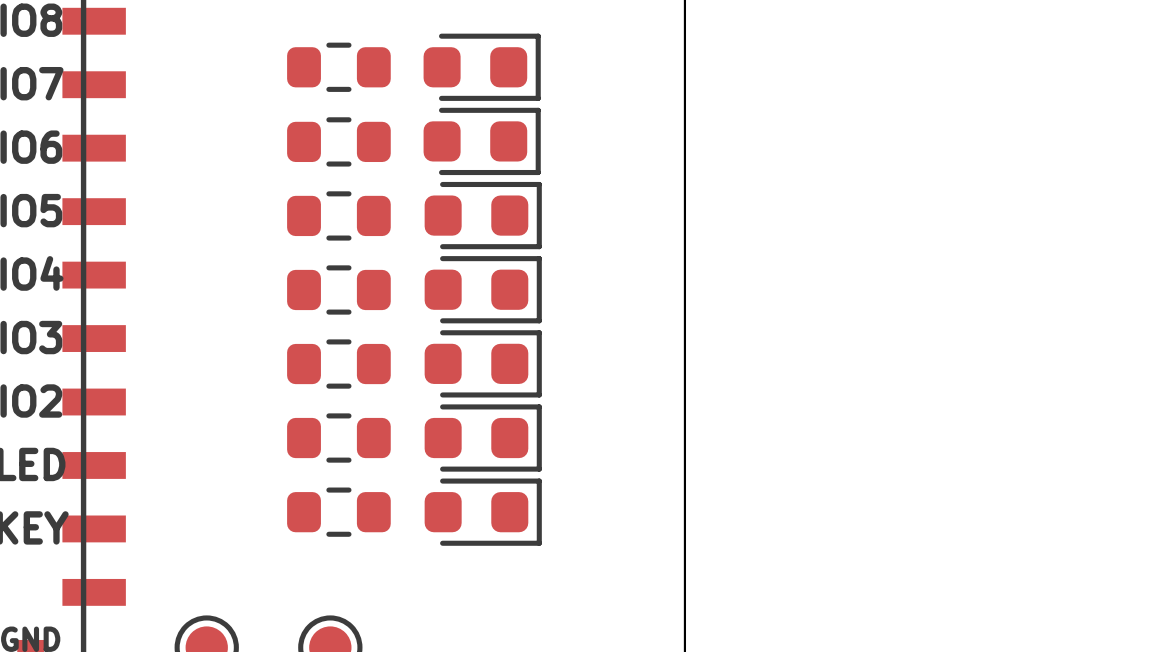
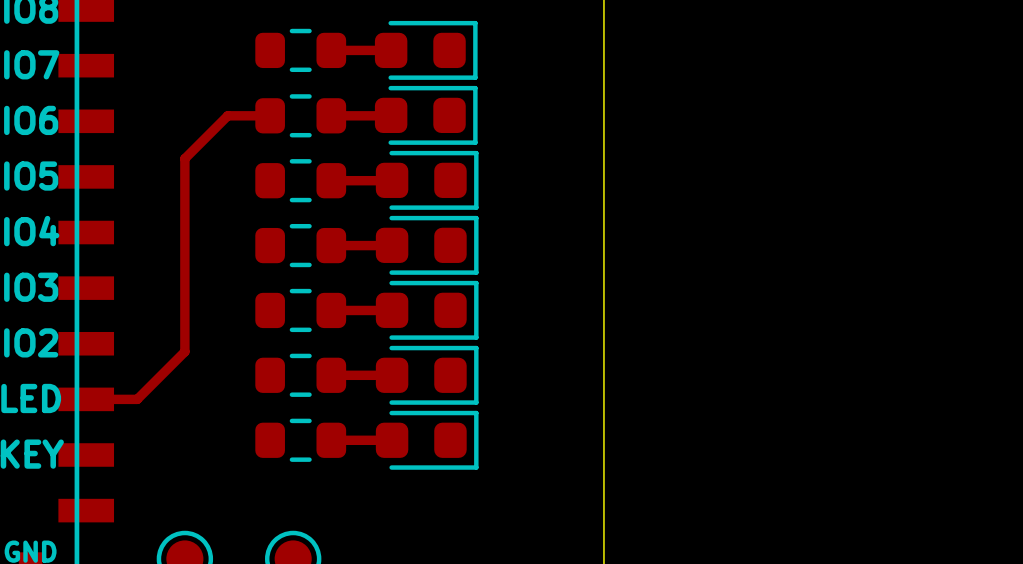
top track: none -> (331, 50) (391, 50)
top track: none -> (270, 115) (227, 115) (184, 158) (184, 351) (137, 399) (86, 399)
top track: none -> (331, 115) (390, 115)
top track: none -> (331, 180) (391, 180)
top track: none -> (331, 245) (391, 245)
top track: none -> (331, 310) (391, 310)
top track: none -> (331, 375) (392, 375)
top track: none -> (331, 440) (392, 440)

